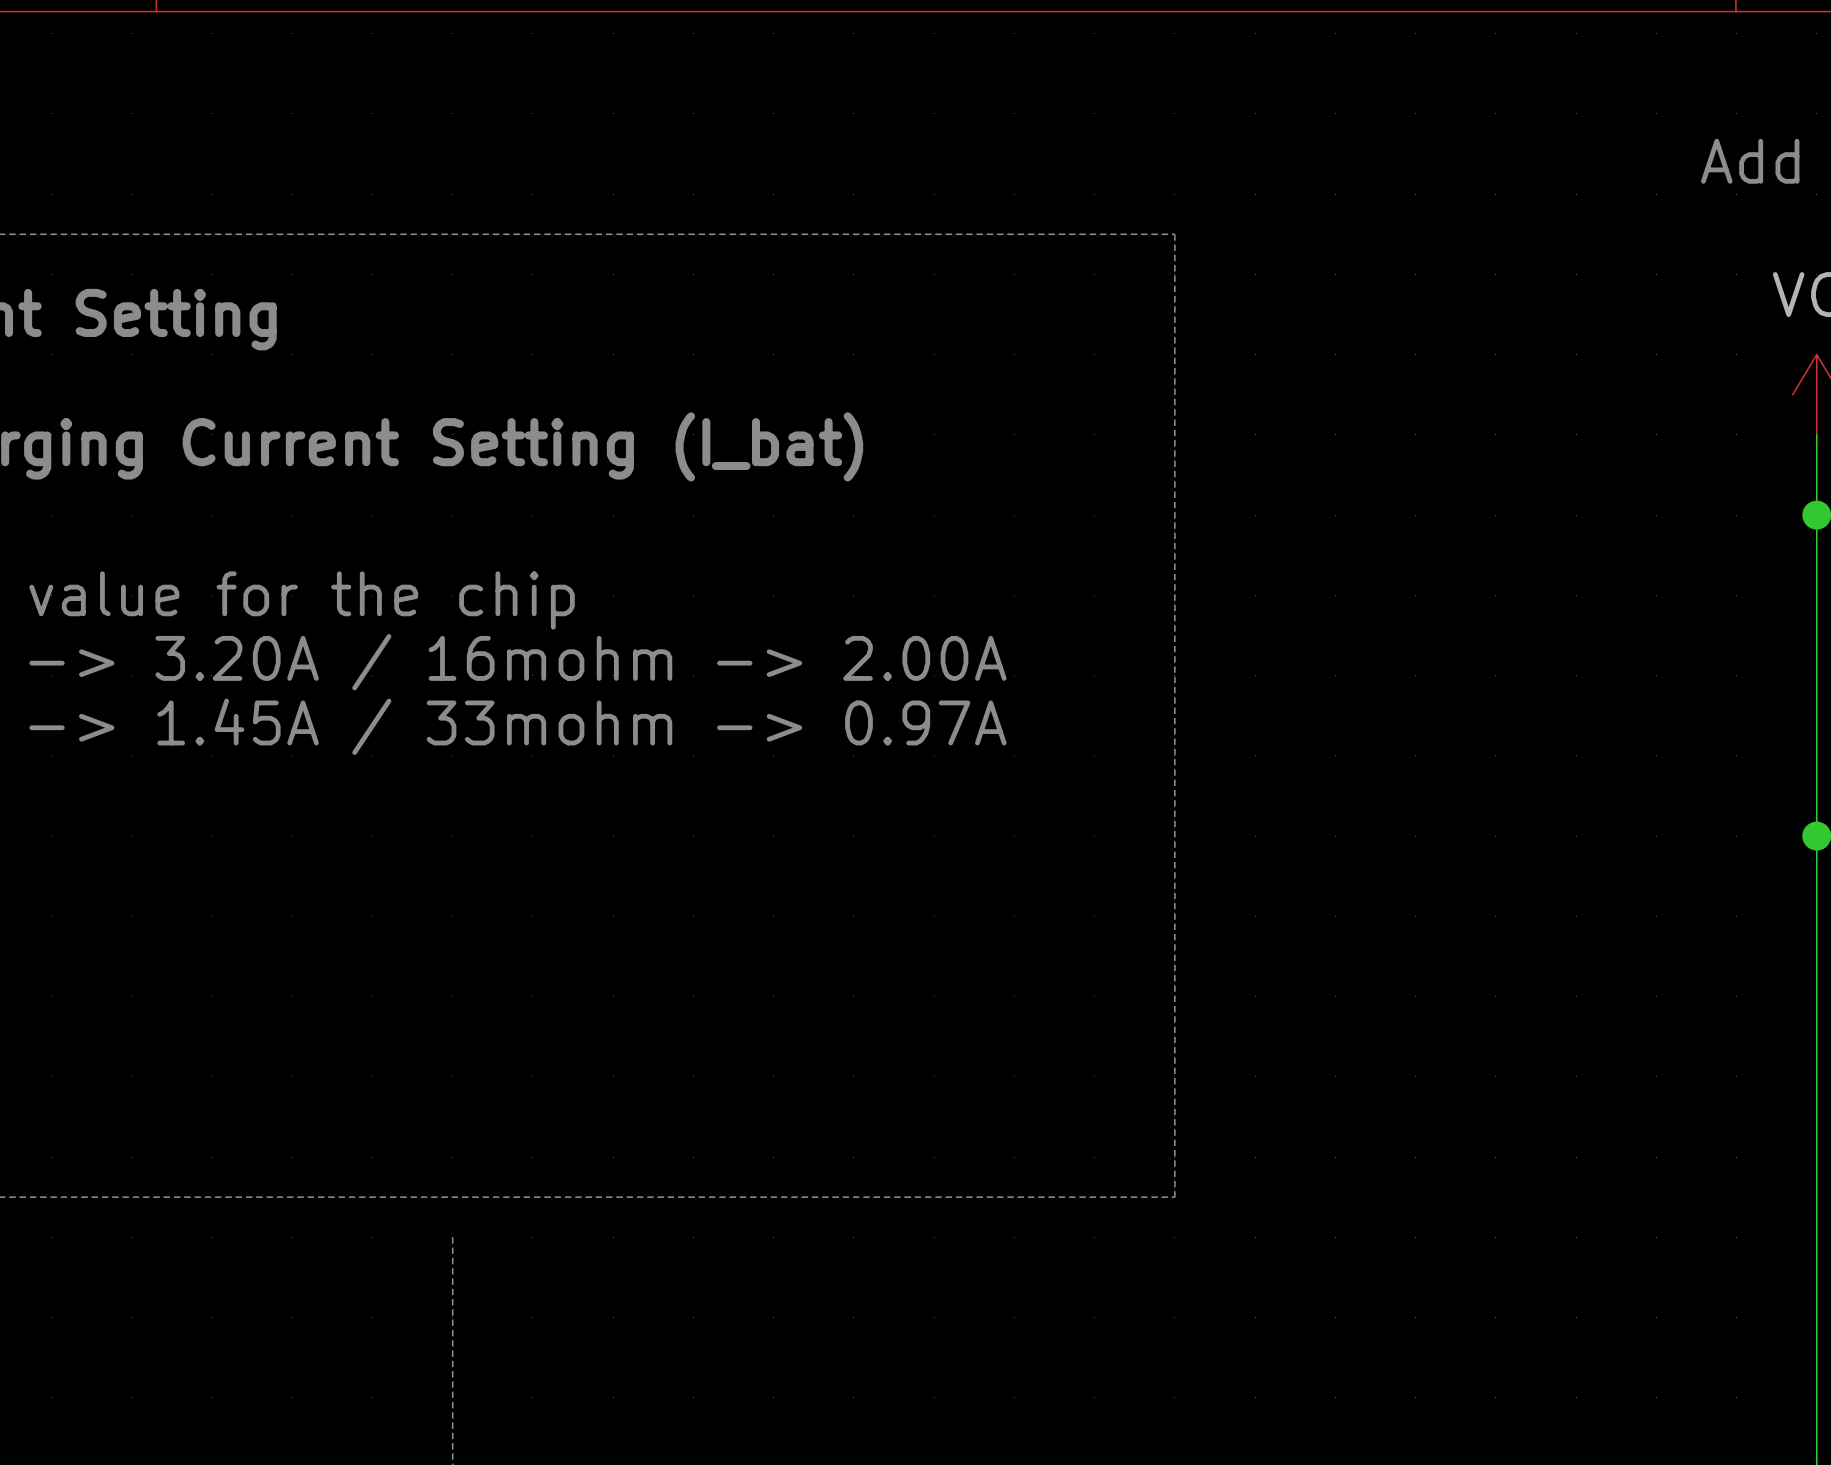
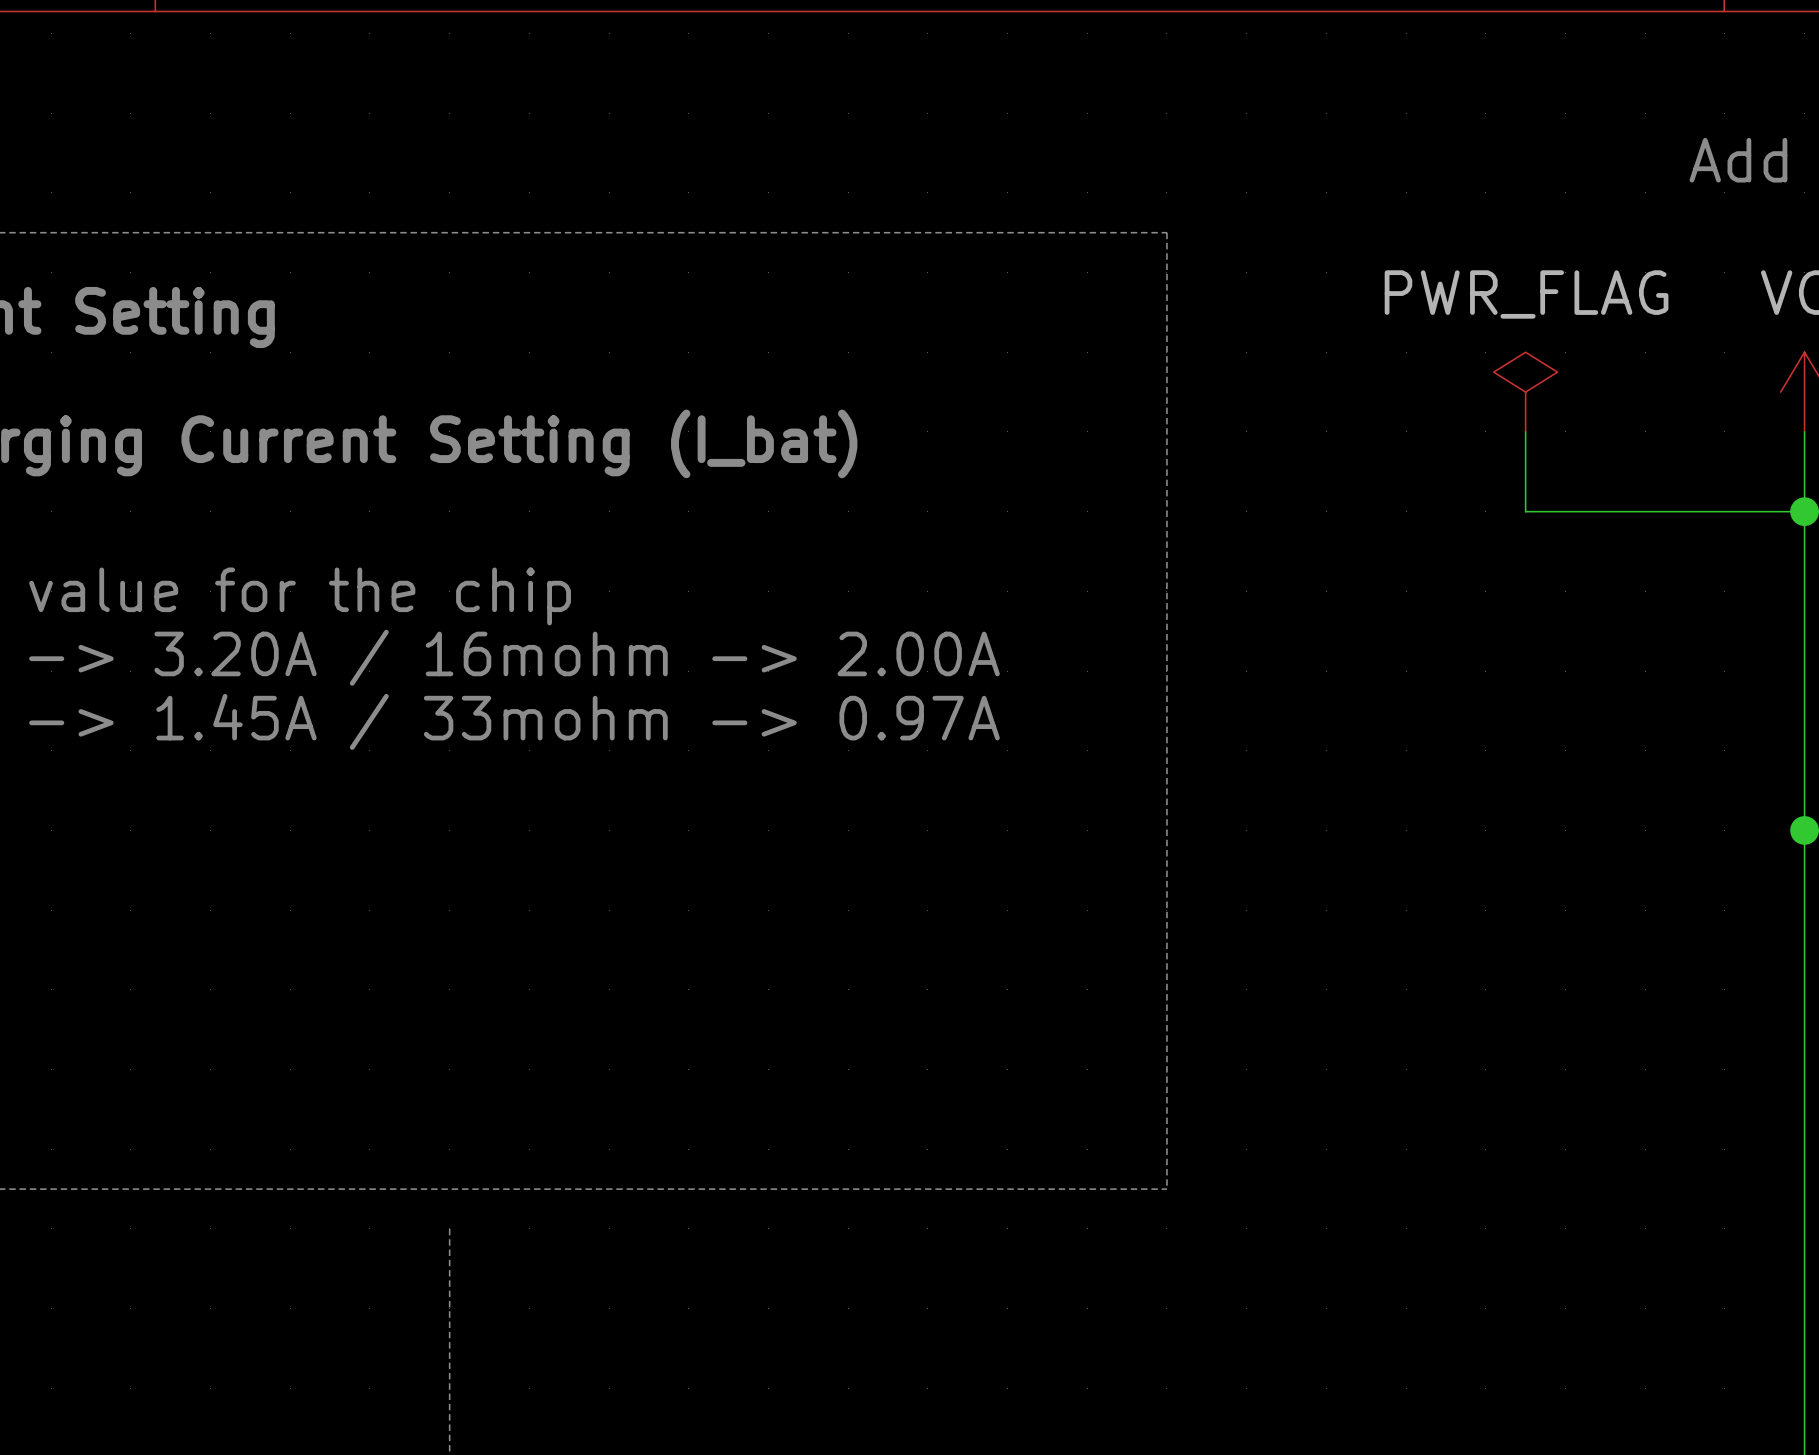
power symbol: none -> PWR_FLAG (1525, 392)
wire: none -> (1525, 431) (1525, 511) (1804, 511)

